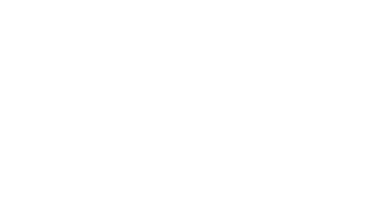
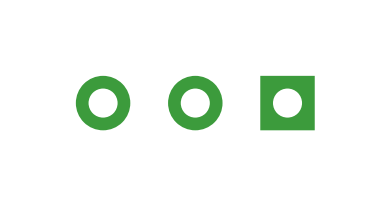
part: none -> (195, 103)

